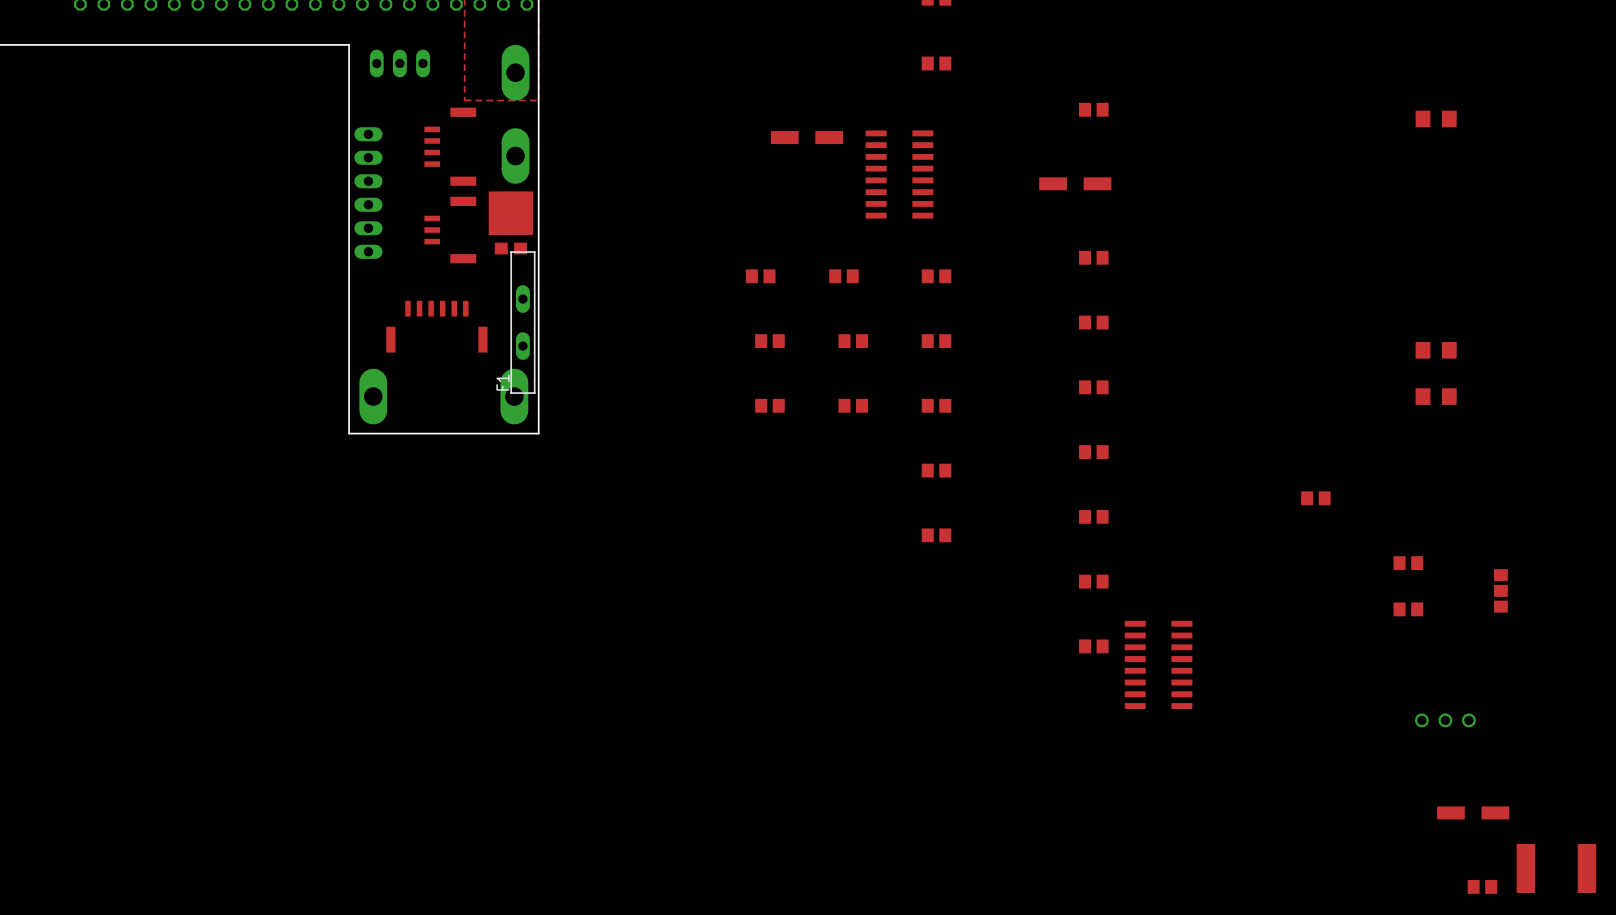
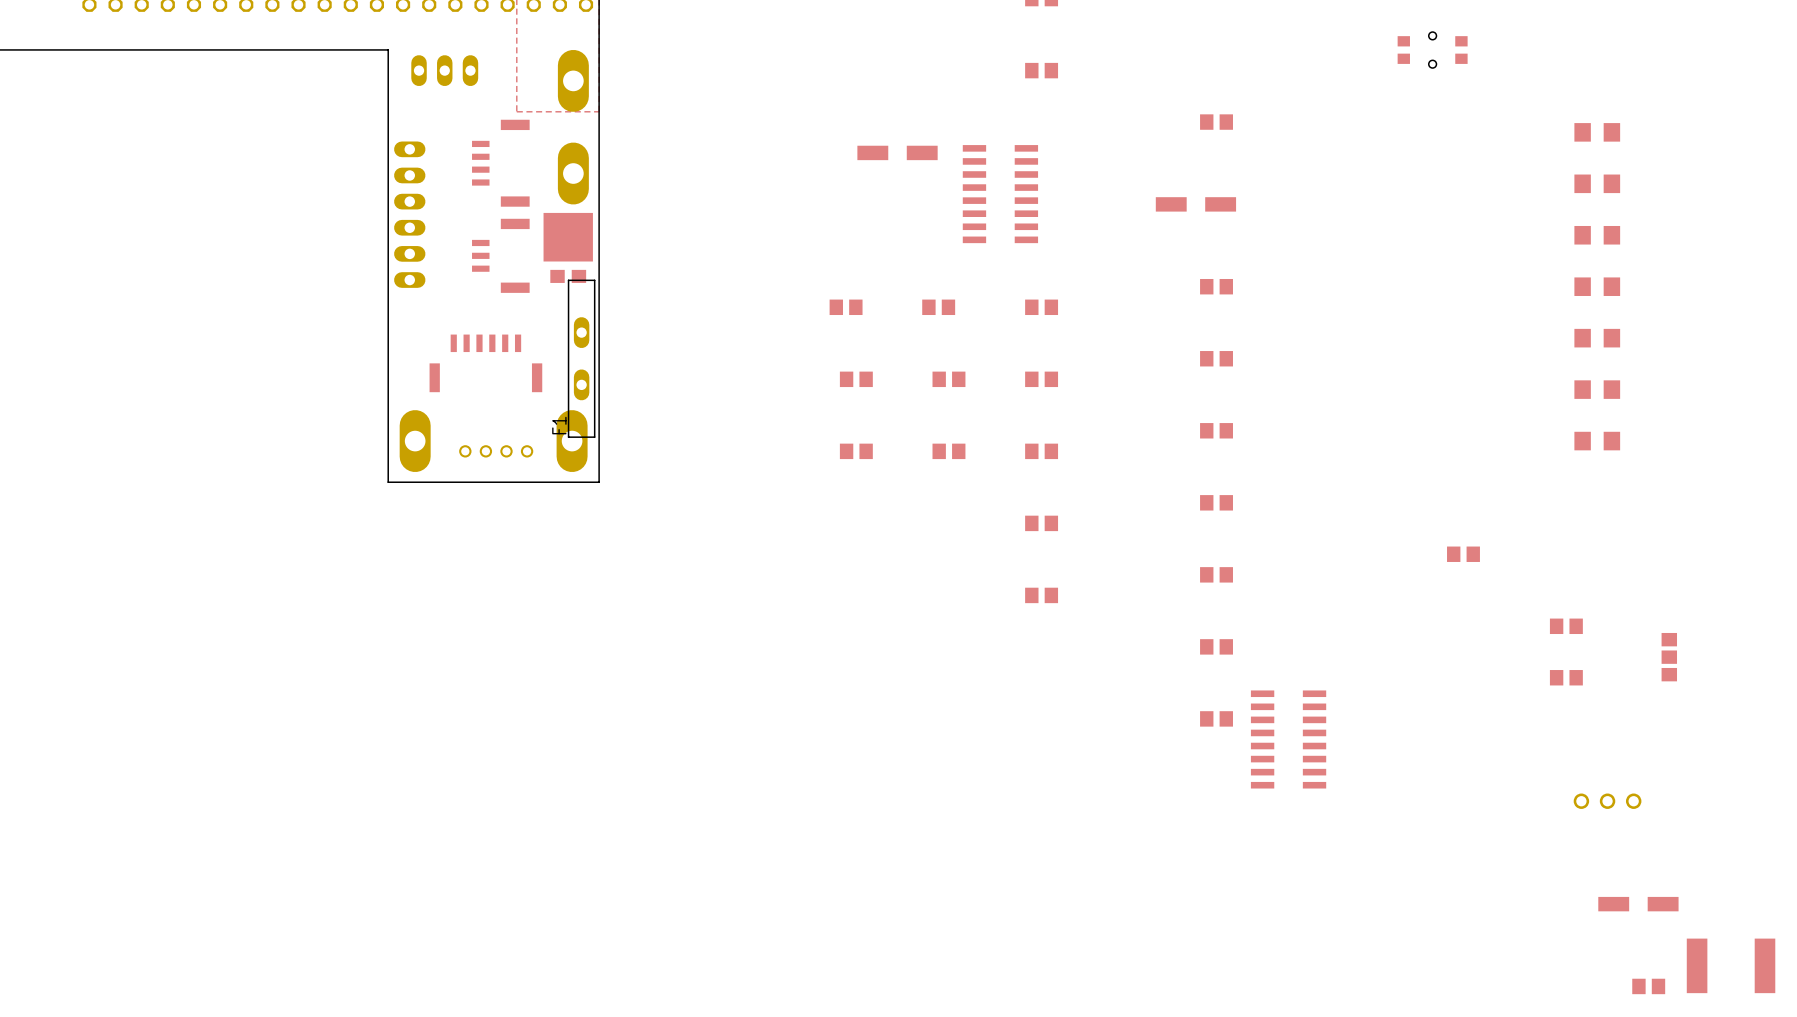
part: none -> (1432, 50)
part: none -> (1597, 183)
part: none -> (1597, 235)
part: none -> (1597, 286)
part: none -> (1597, 338)
part: none -> (496, 451)

